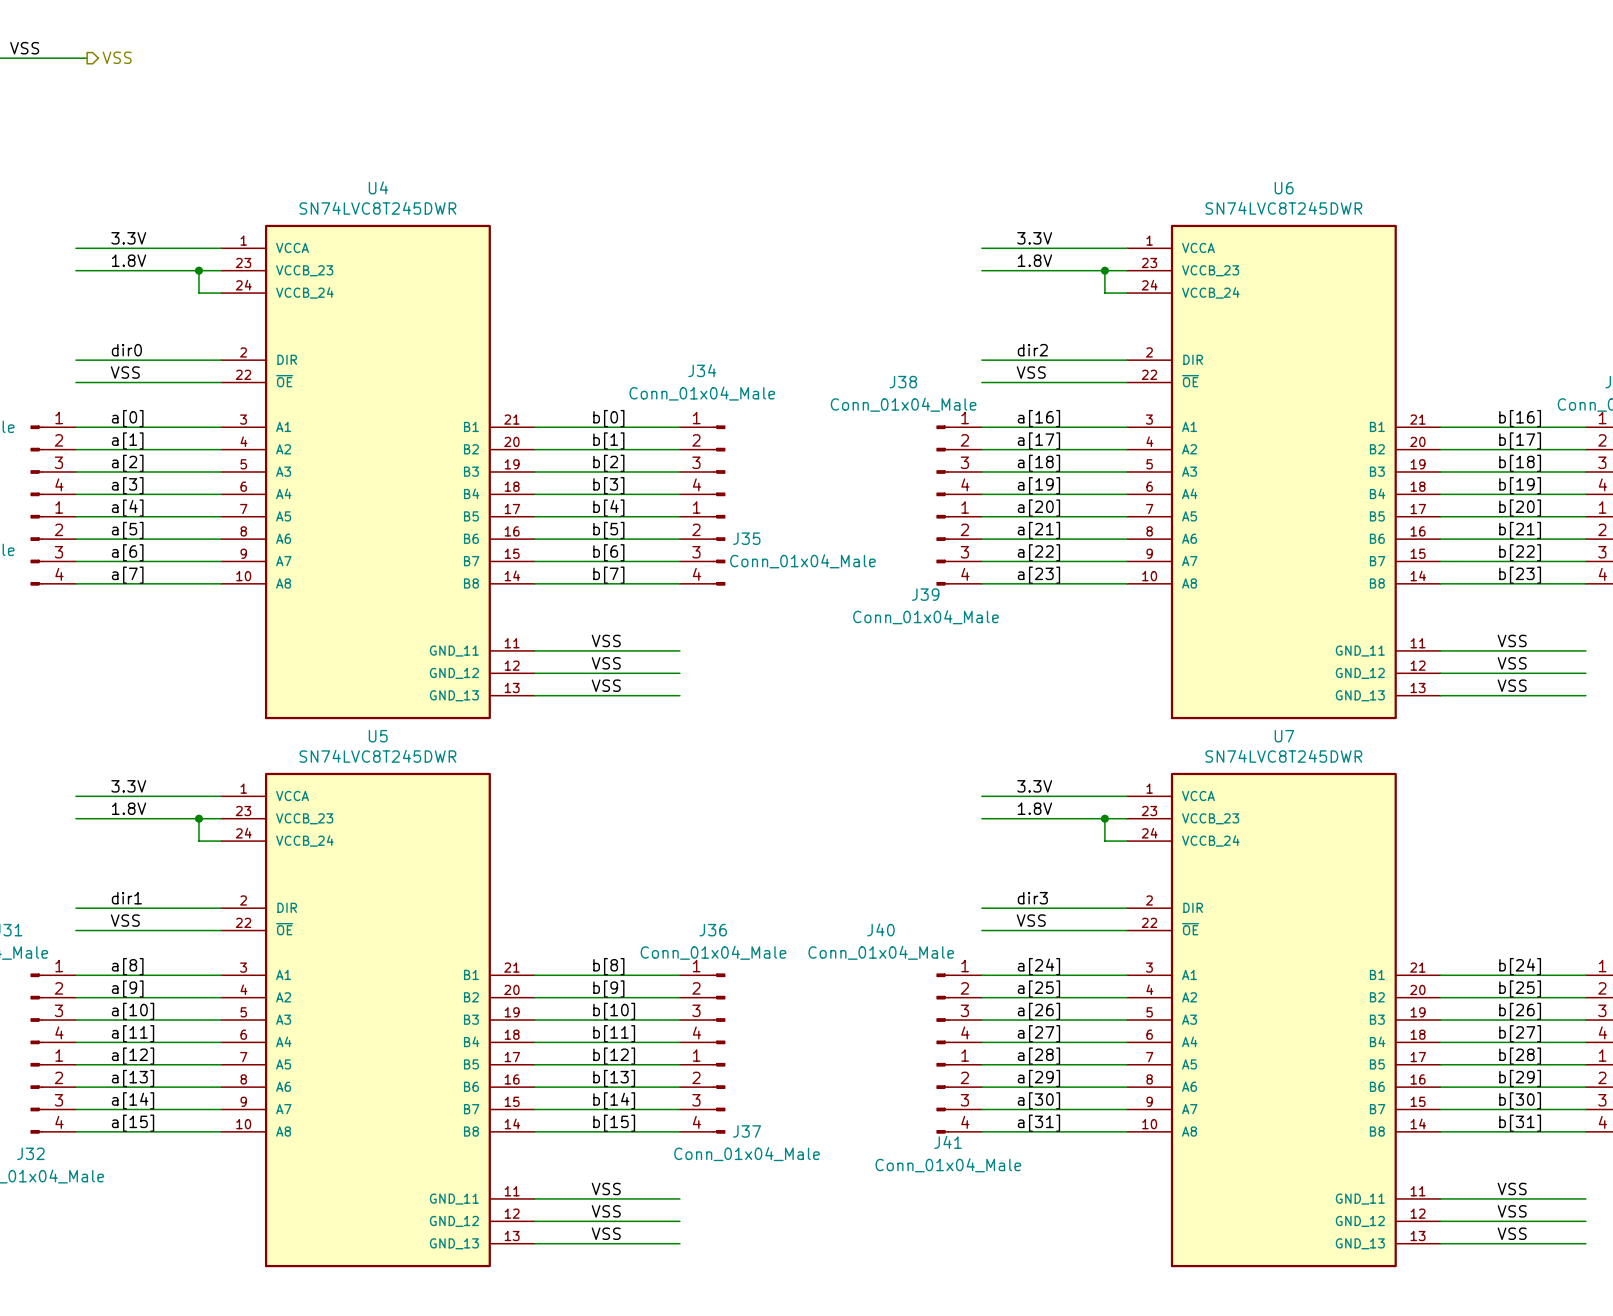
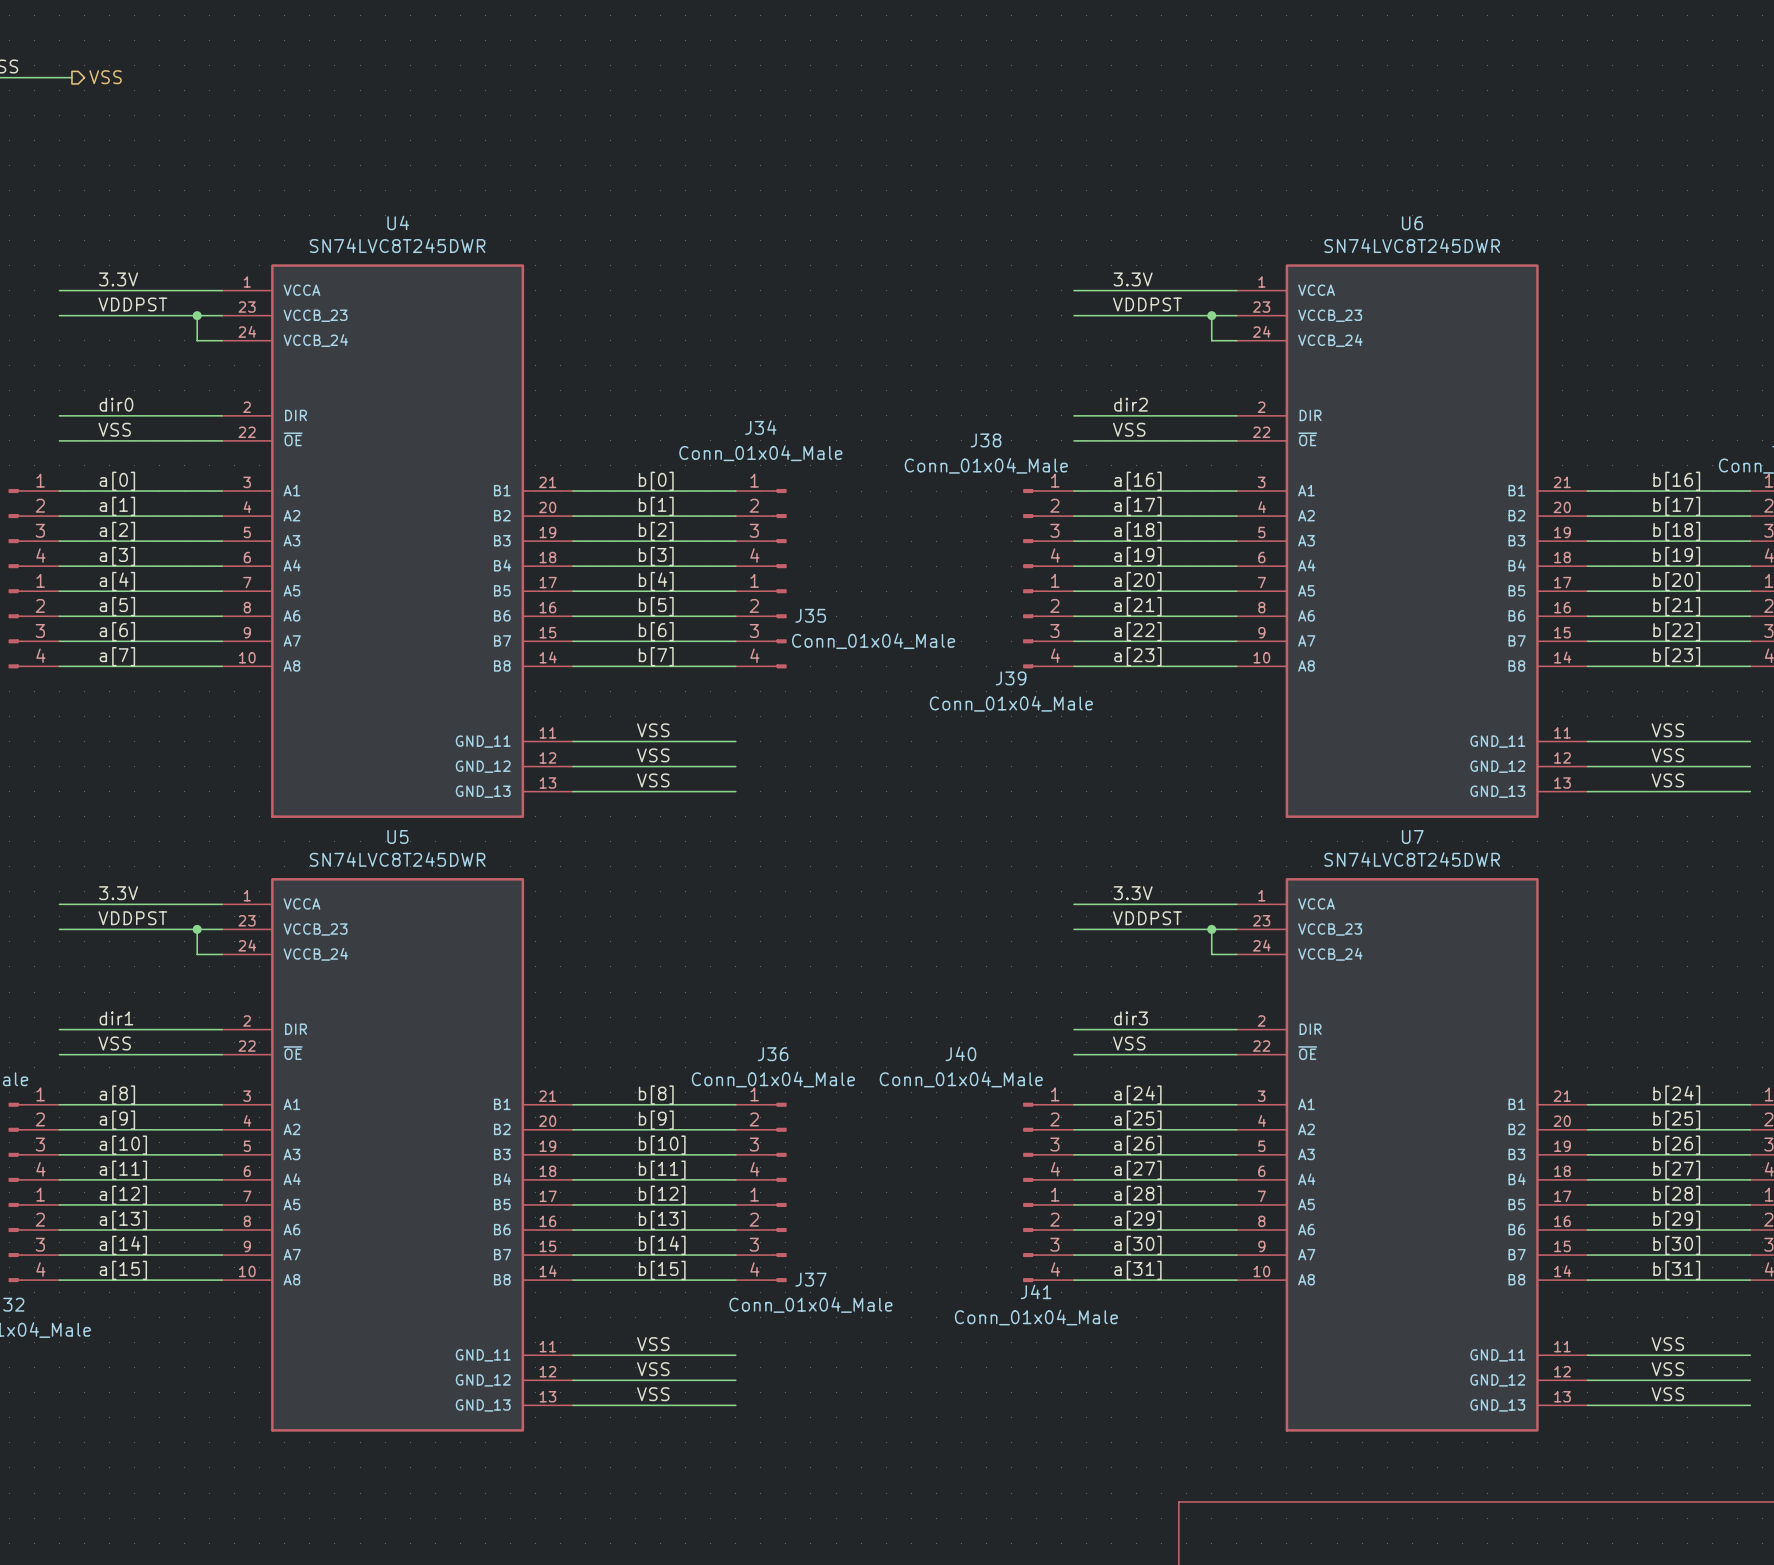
label: 1.8V (129, 260) -> VDDPST (132, 304)
label: 1.8V (1034, 260) -> VDDPST (1147, 304)
label: 1.8V (129, 808) -> VDDPST (132, 918)
label: 1.8V (1034, 808) -> VDDPST (1147, 918)

